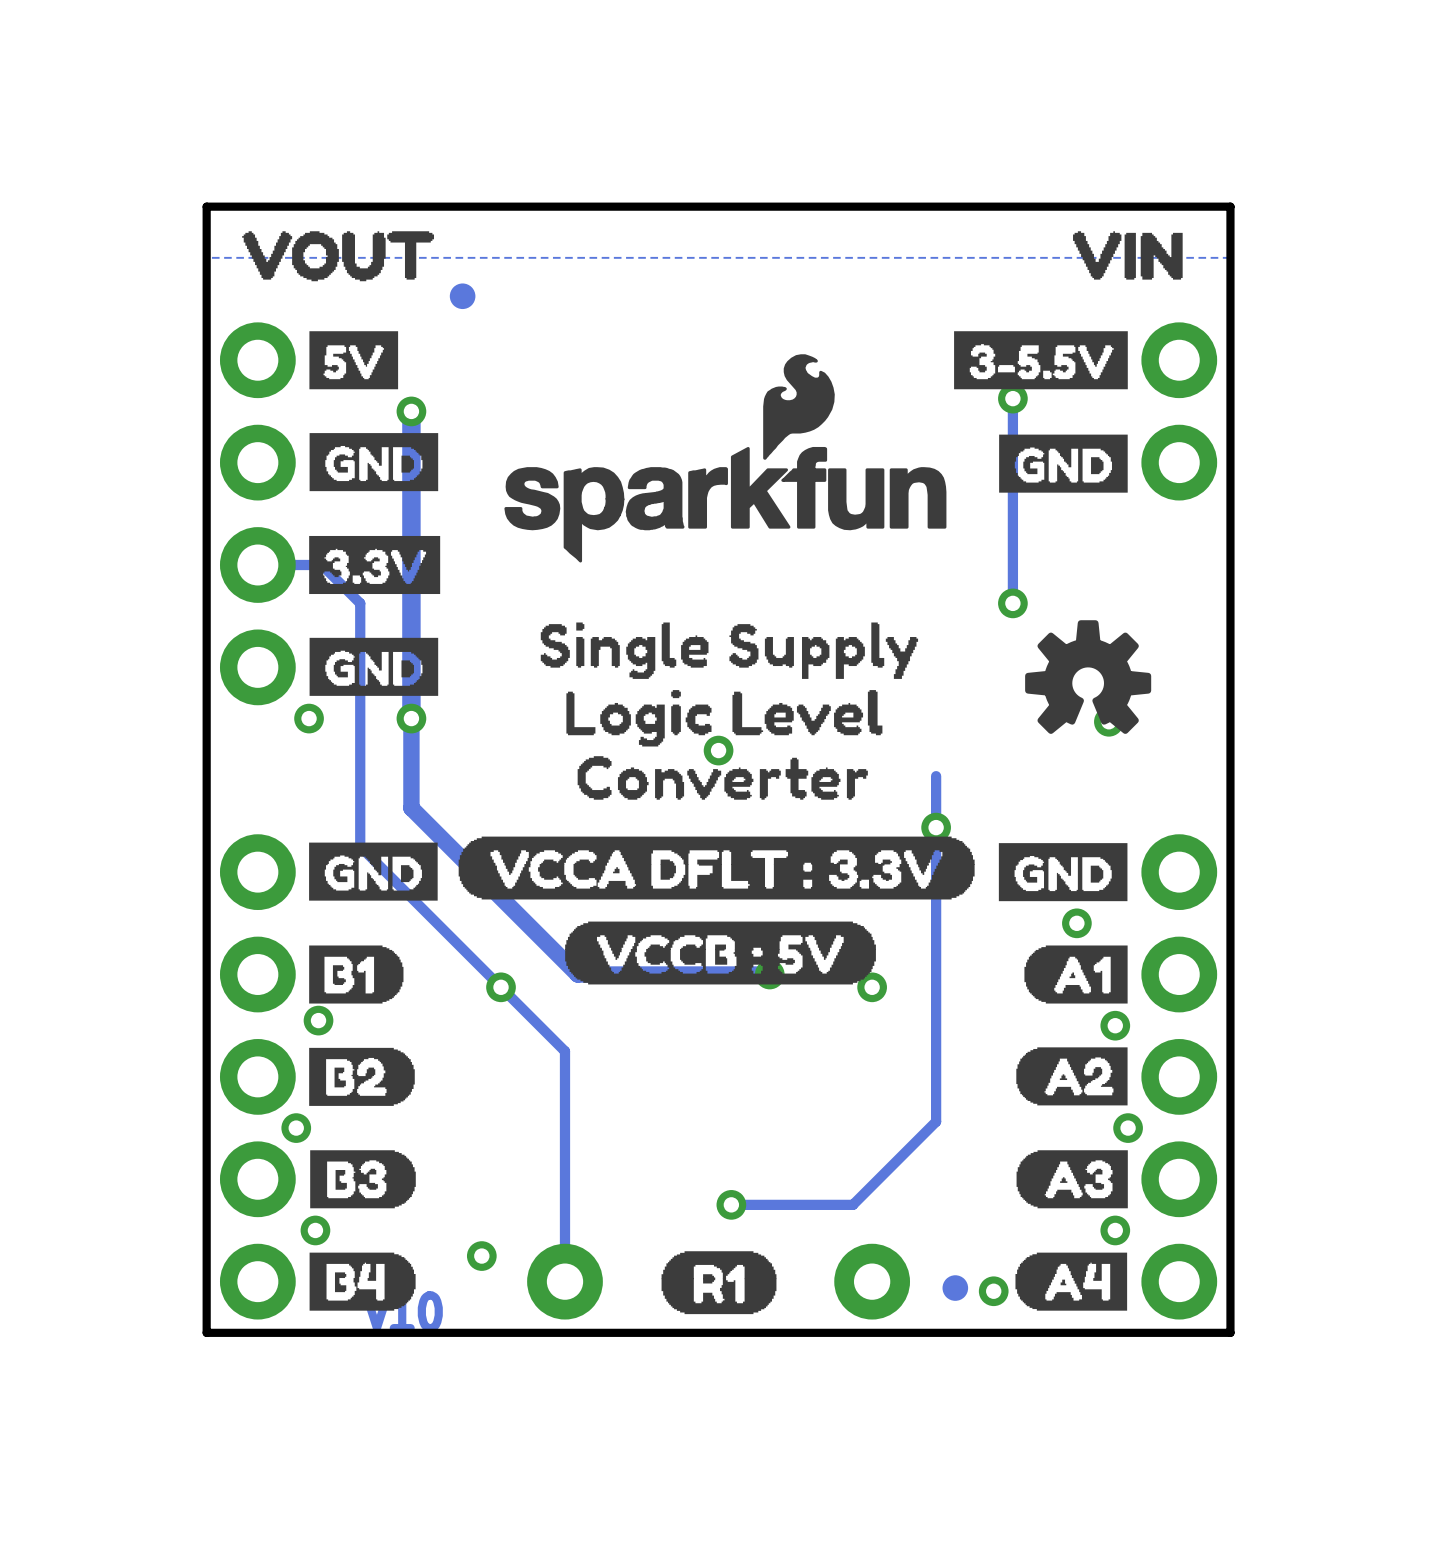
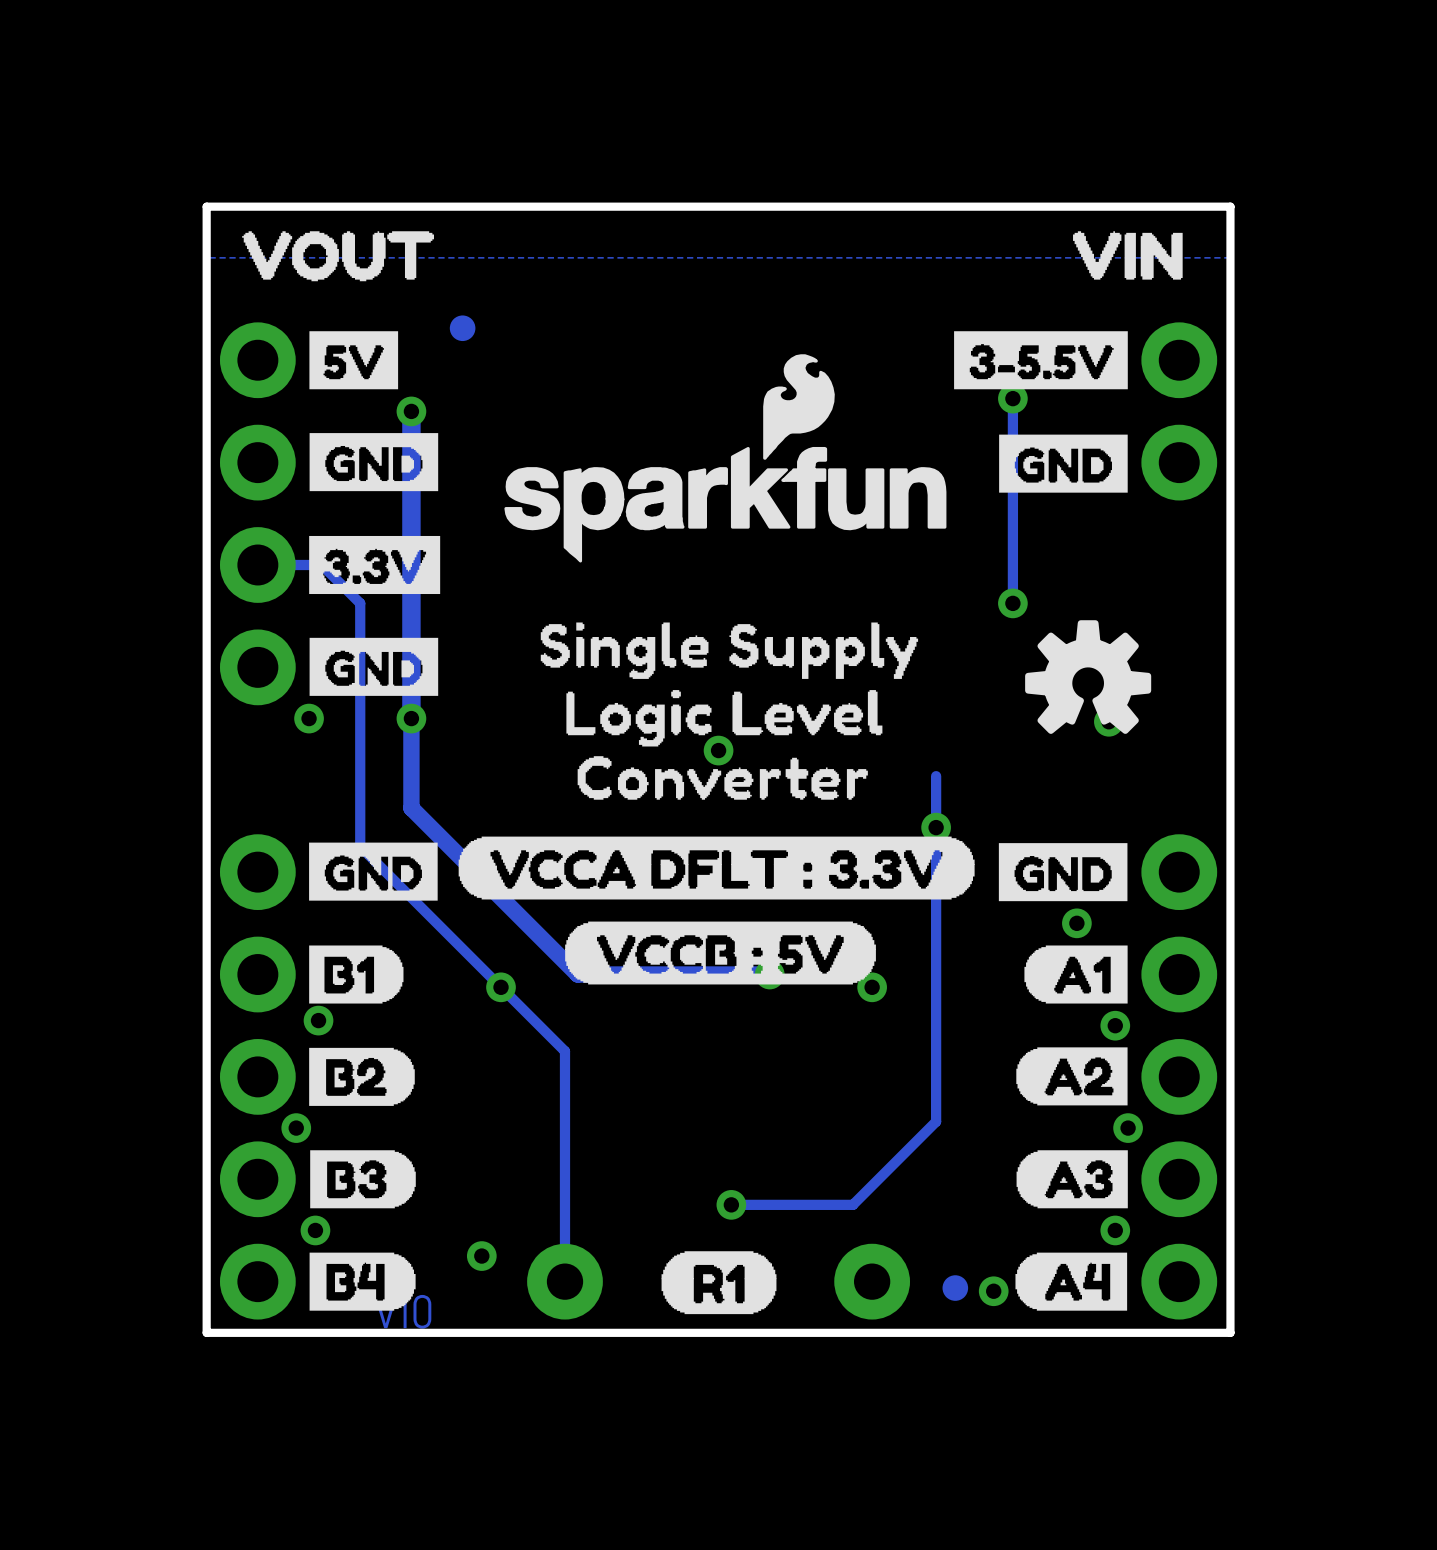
part position: (462, 296) -> (462, 328)

